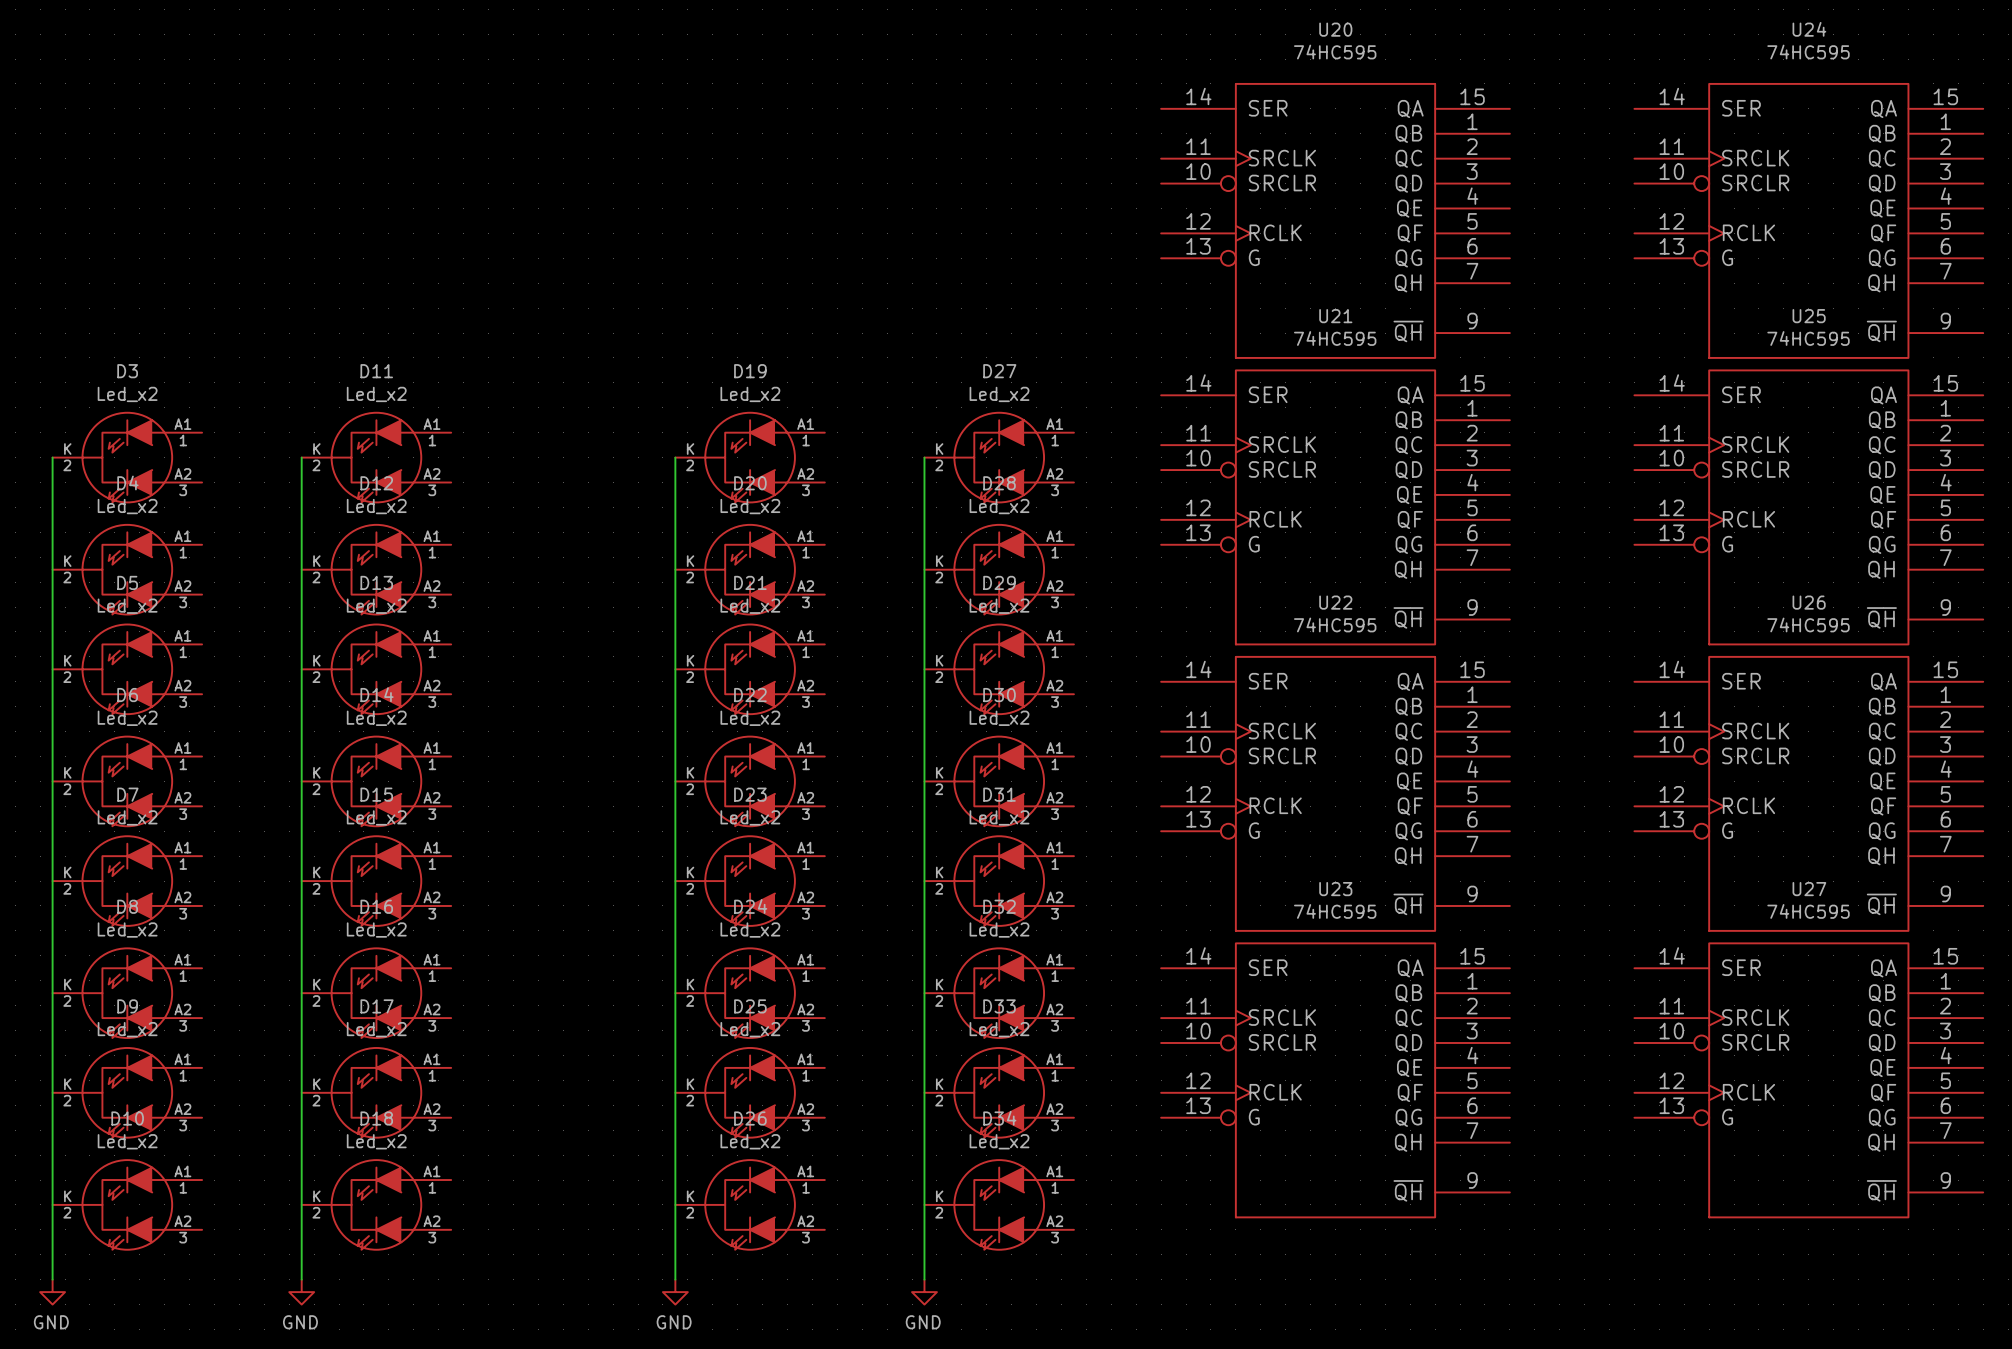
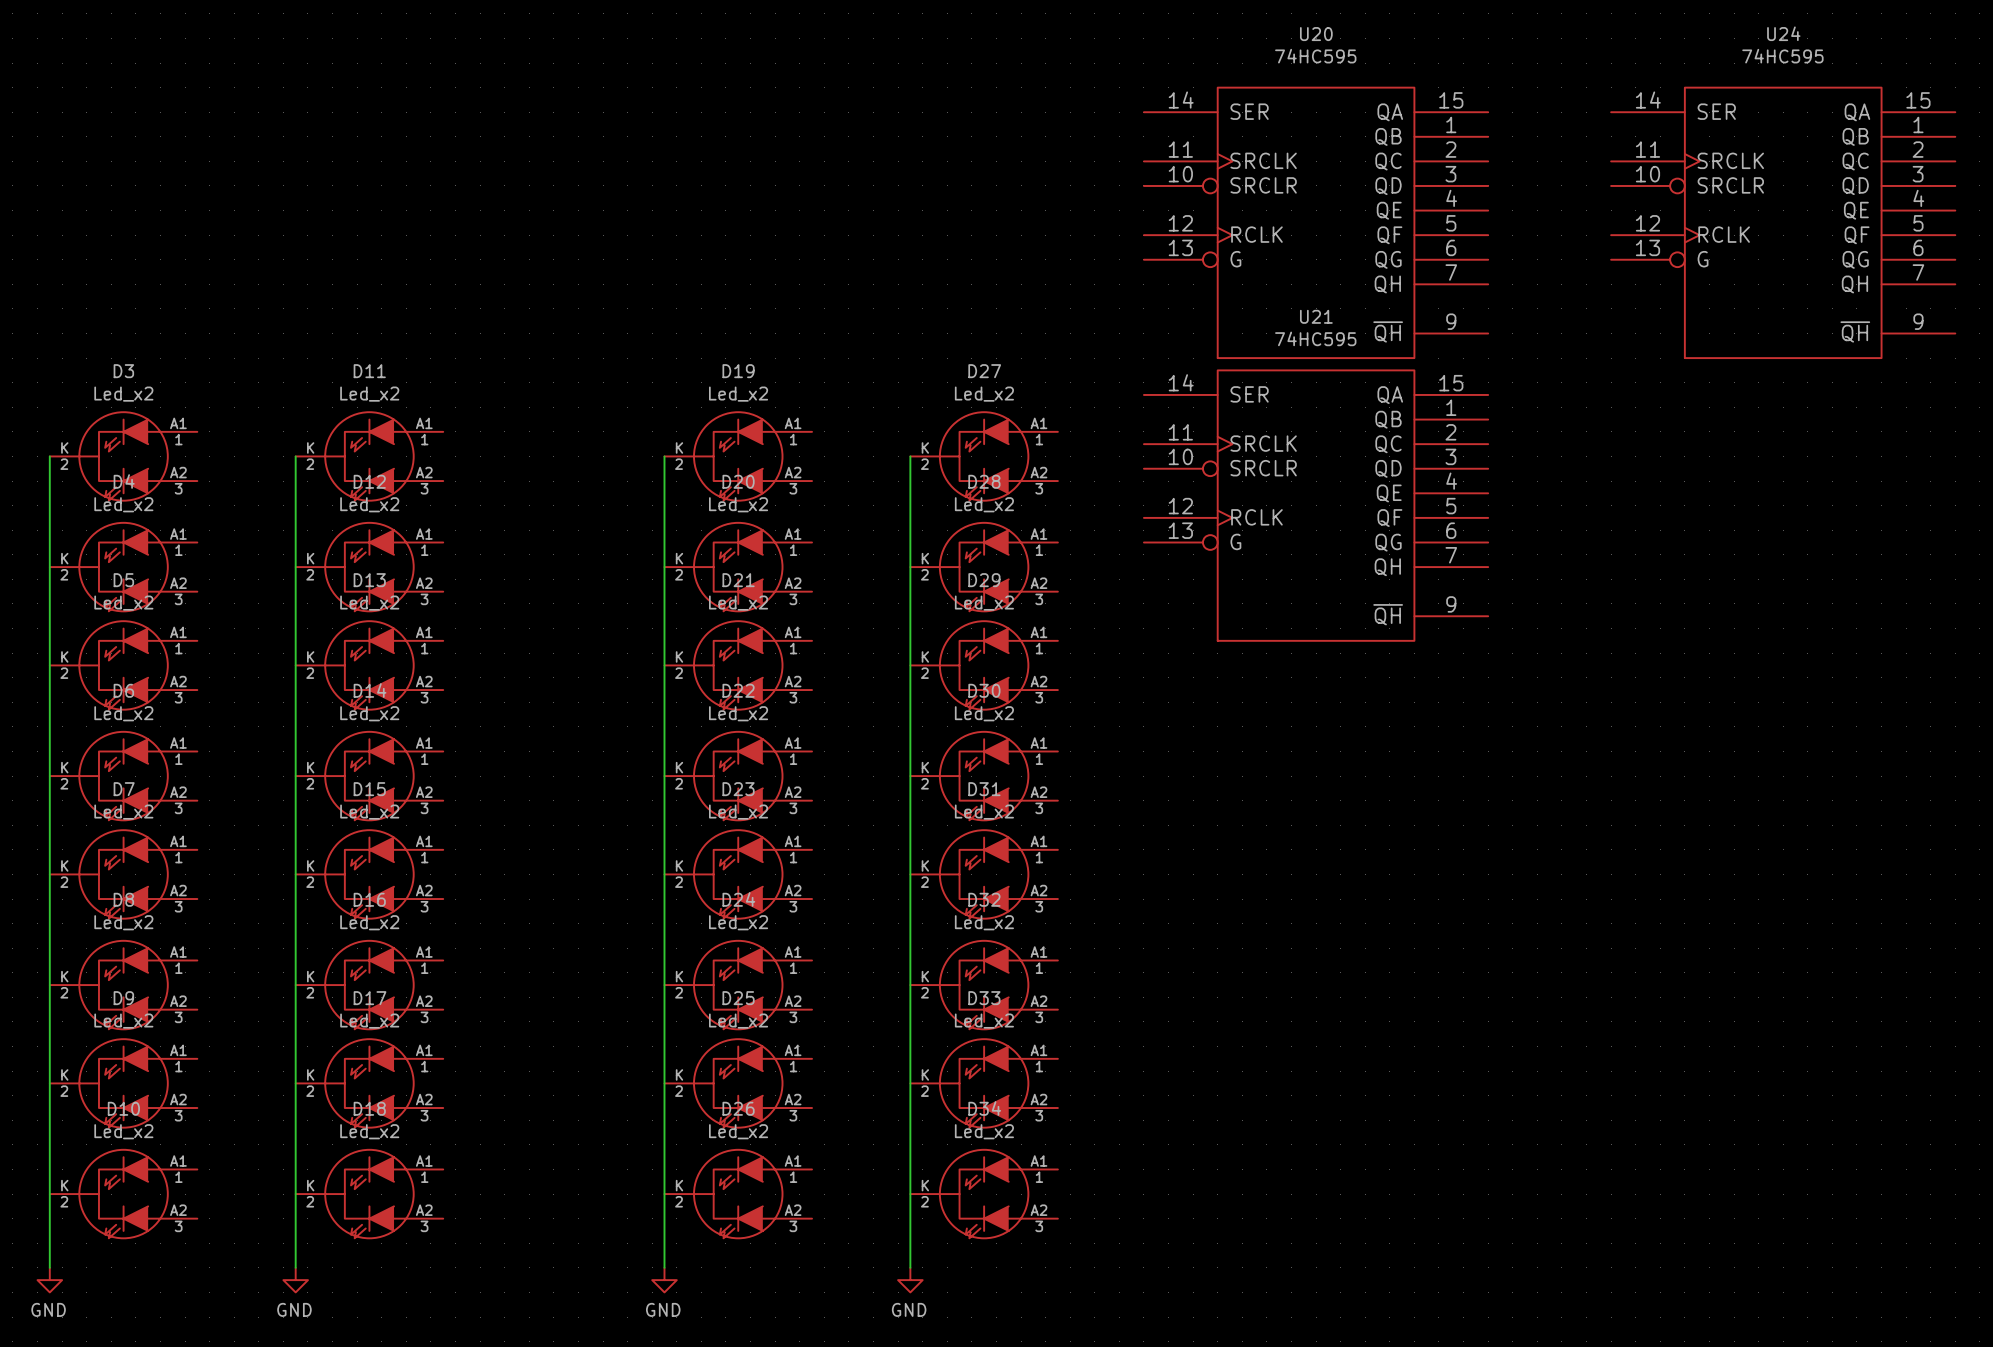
U25: 74HC595 (1808, 507) -> none
U22: 74HC595 (1335, 793) -> none
U26: 74HC595 (1808, 793) -> none
U23: 74HC595 (1335, 1080) -> none
U27: 74HC595 (1808, 1080) -> none

